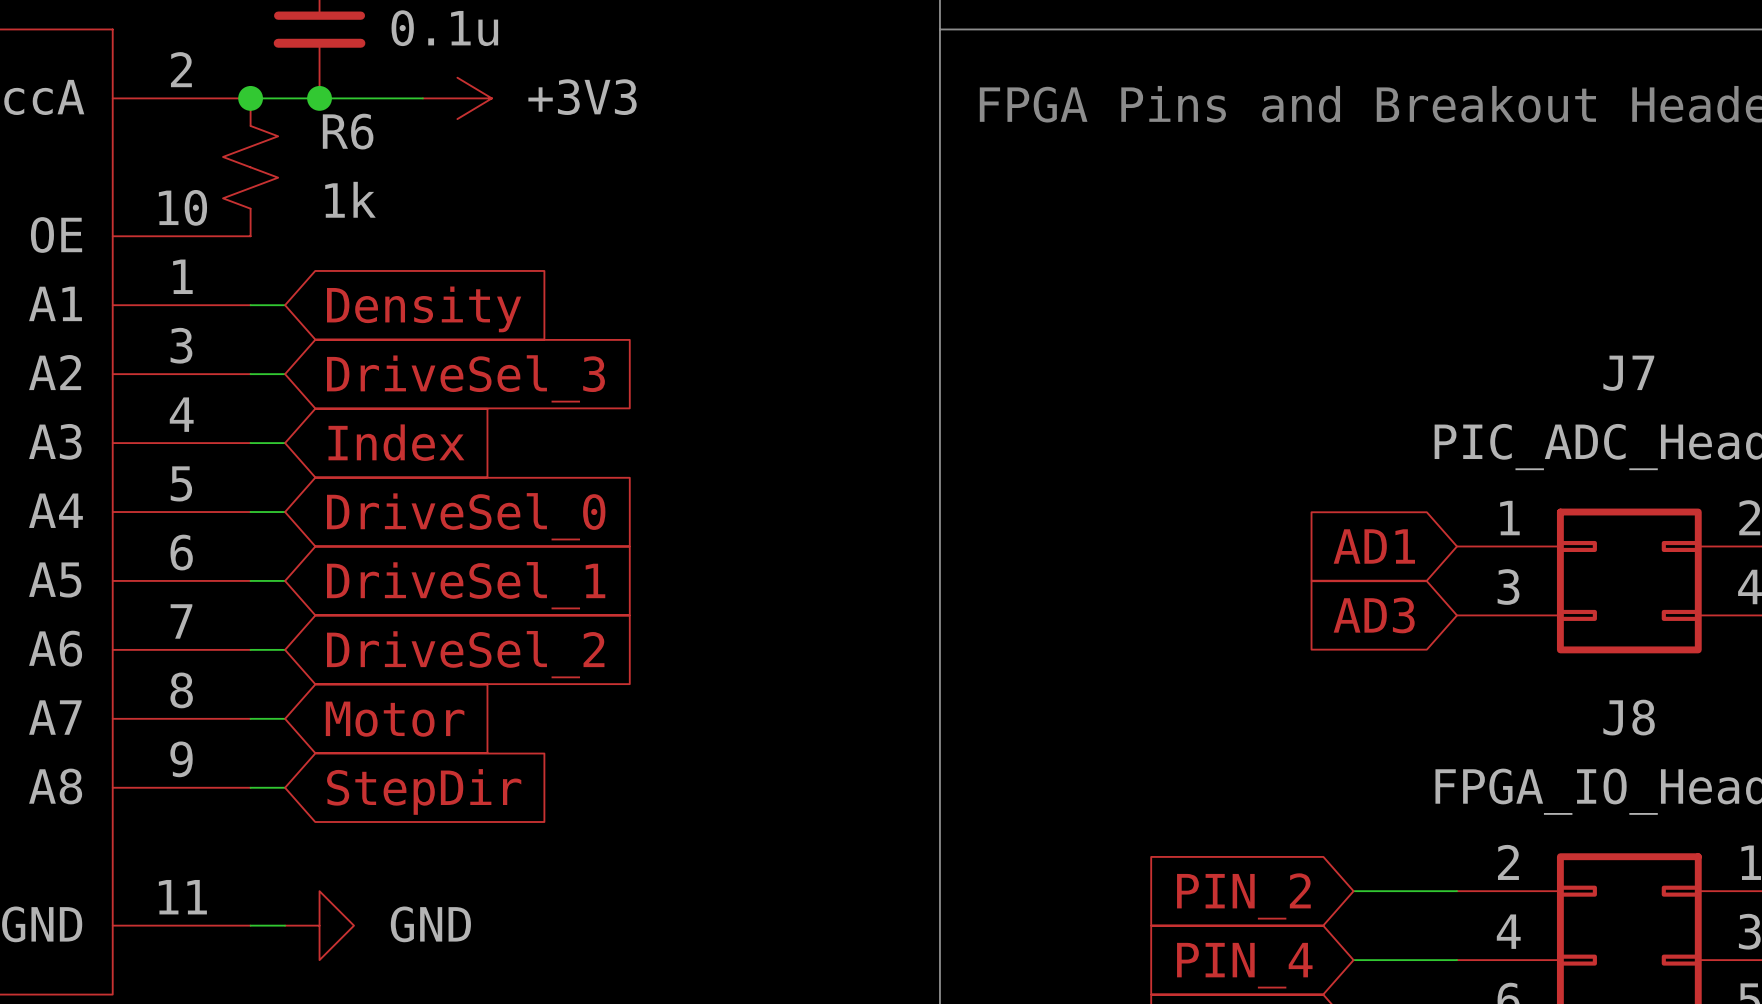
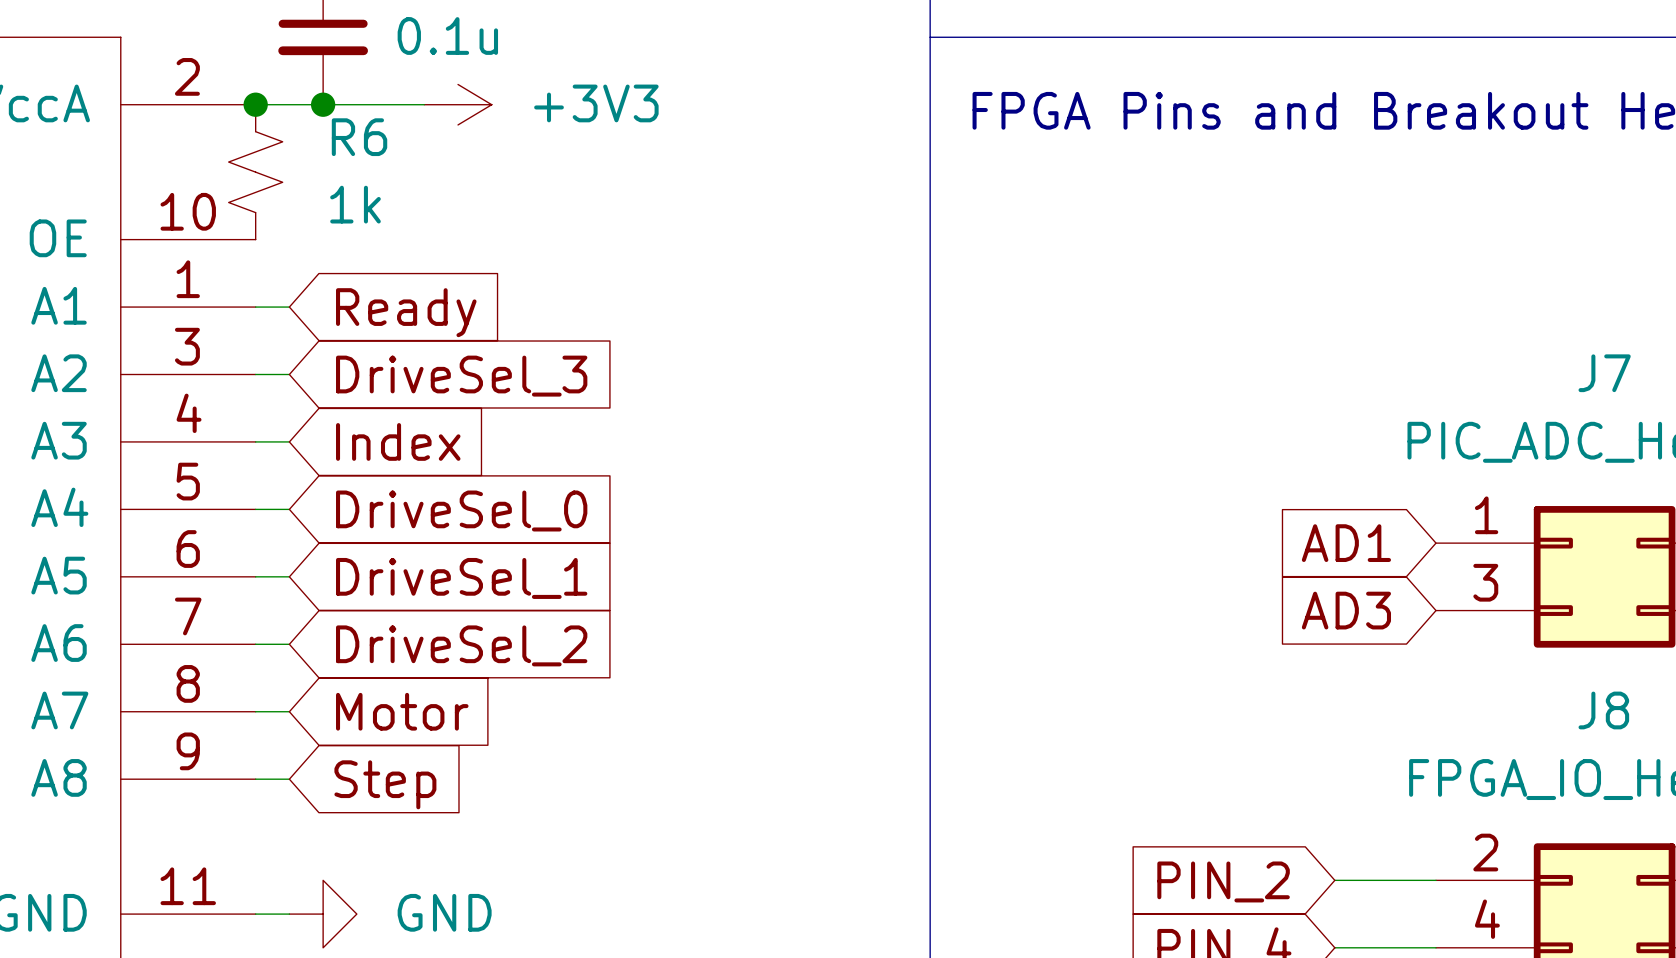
global label: Density (424, 309) -> Ready (406, 312)
global label: StepDir (424, 791) -> Step (385, 784)

